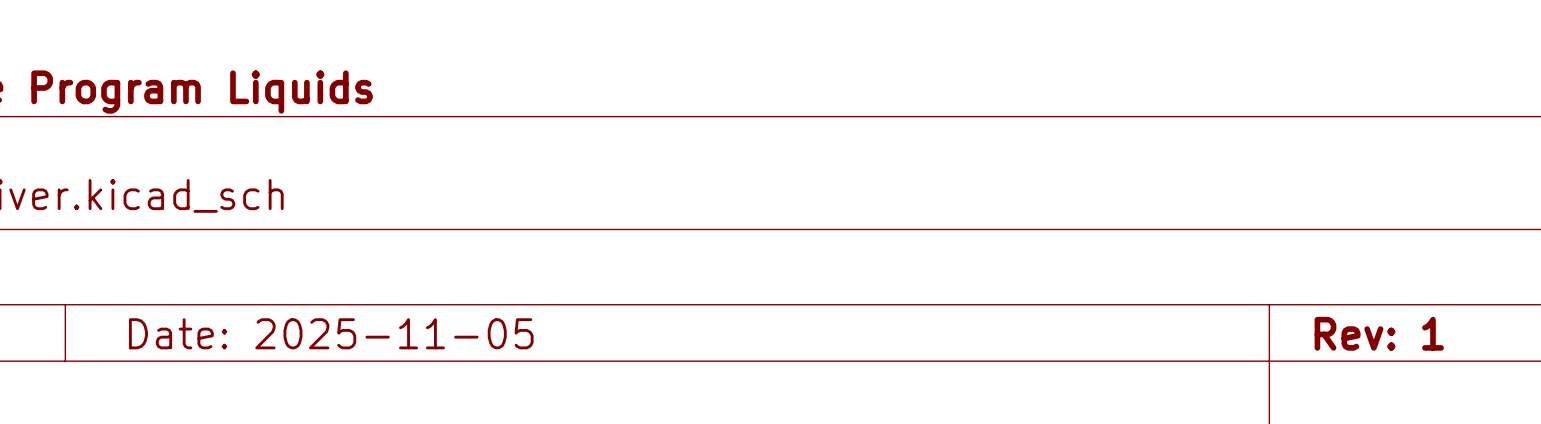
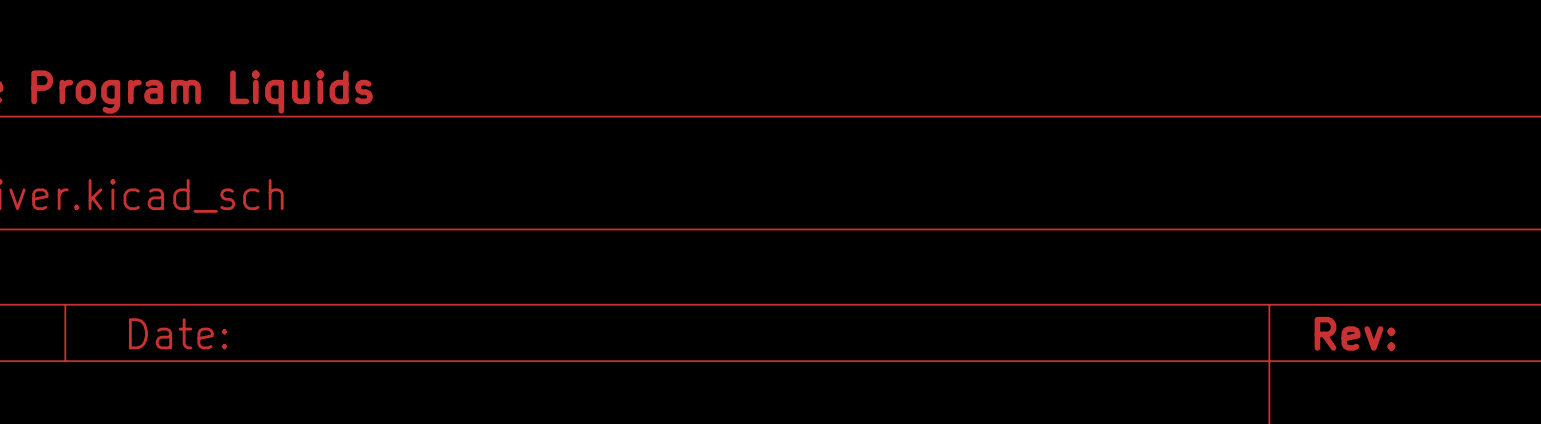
title block: Date: 2025-11-05 (331, 333) -> Date: (178, 333)
title block: Rev: 1 (1379, 333) -> Rev: (1355, 333)

